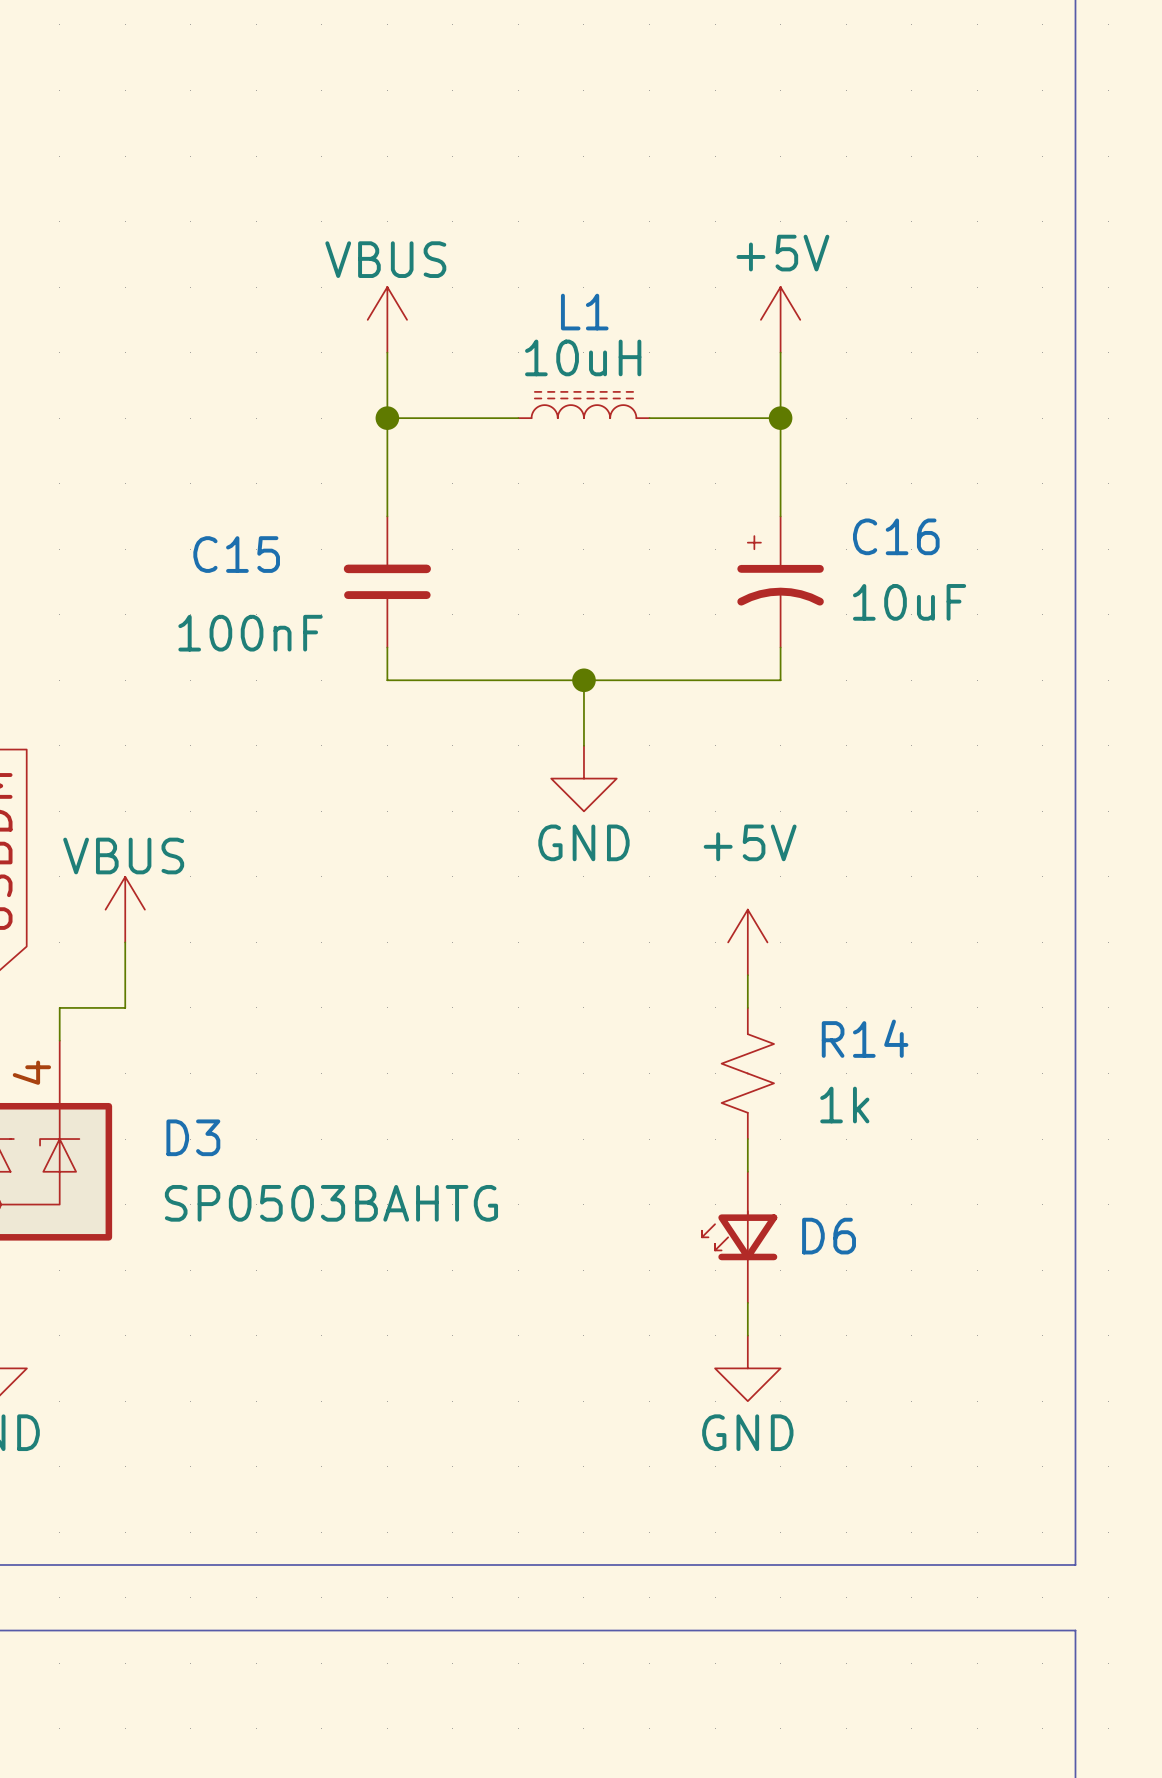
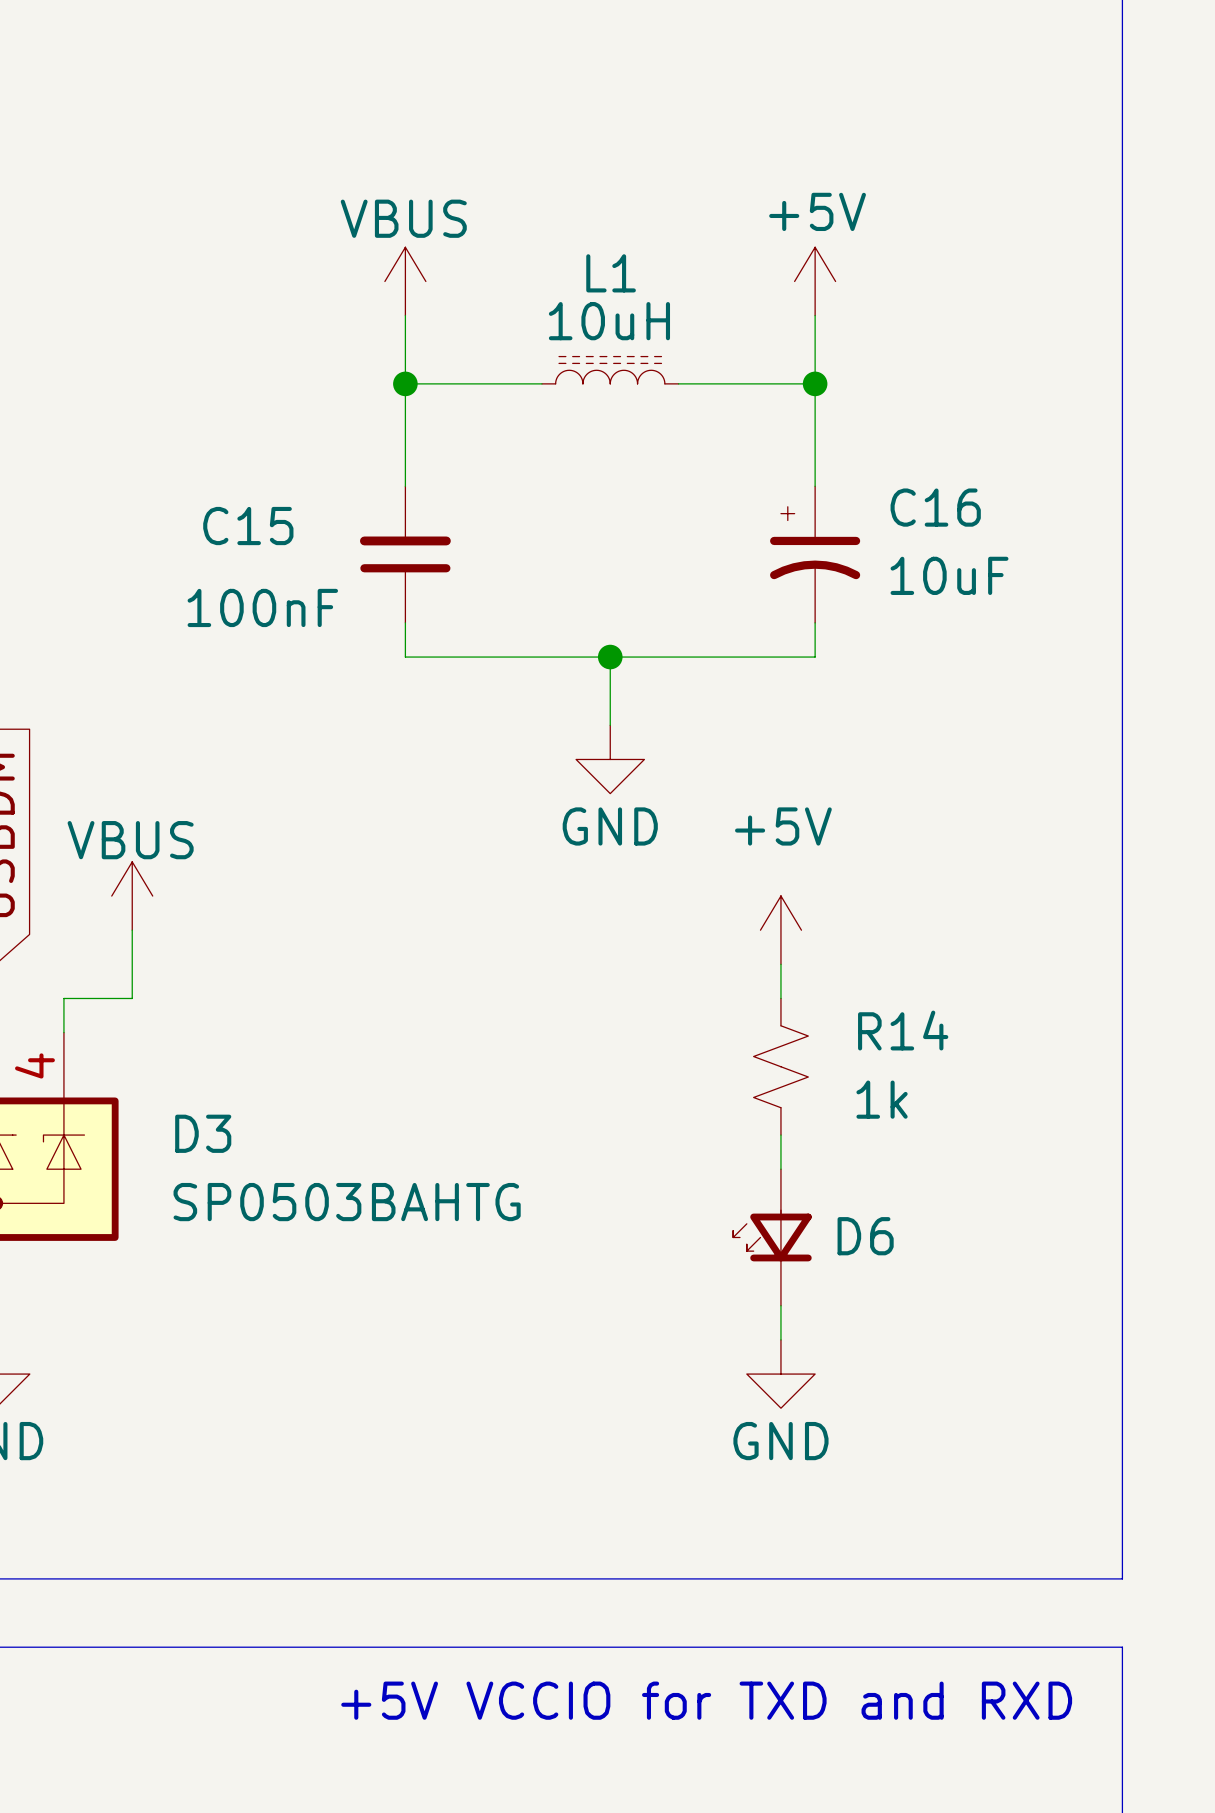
text: none -> +5V VCCIO for TXD and RXD (706, 1700)

